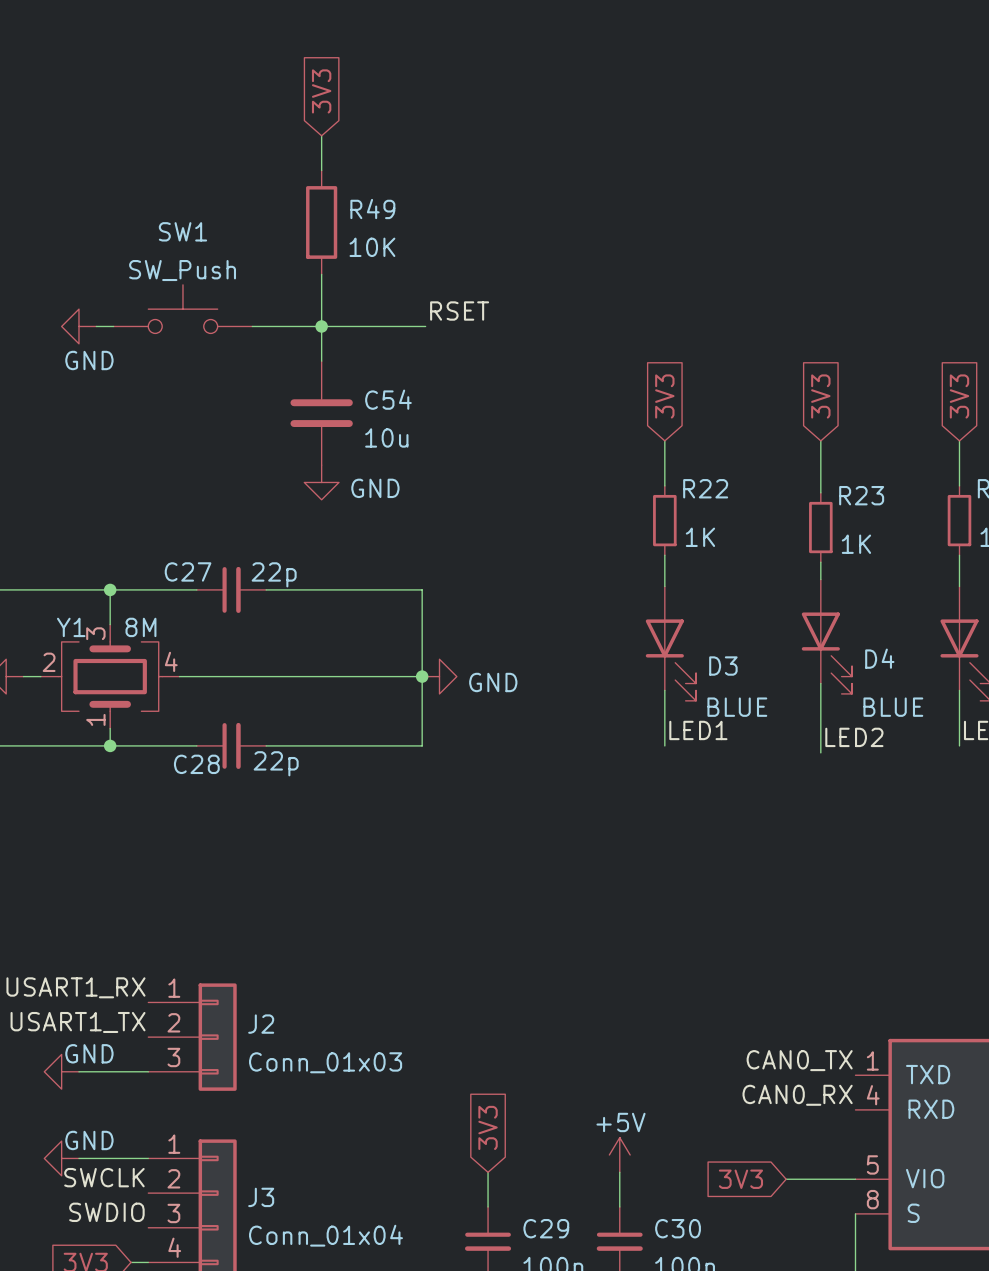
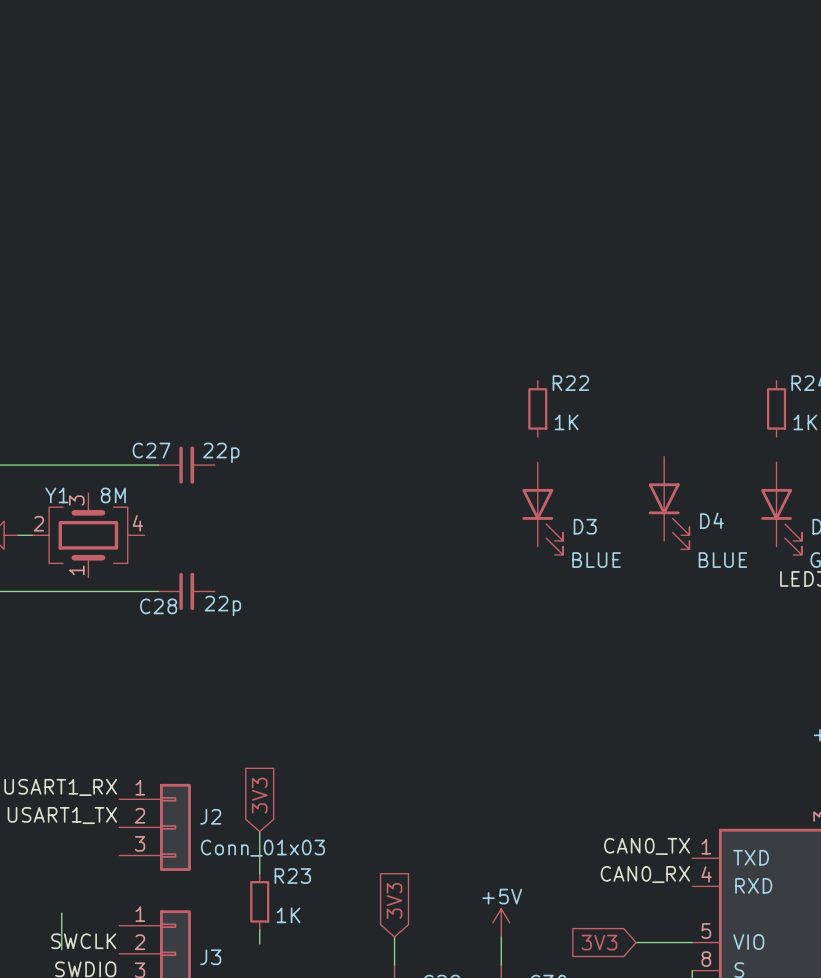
global label: 3V3 (321, 91) -> none
wire: (321, 135) (321, 170) -> none
R49: 10K (321, 222) -> none
wire: (321, 274) (321, 361) -> none
SW1: SW_Push (182, 309) -> none
label: RSET (459, 311) -> none
power symbol: GND (78, 326) -> none
wire: (96, 326) (113, 326) -> none
wire: (252, 326) (425, 326) -> none
junction: (321, 326) -> none
global label: 3V3 (664, 396) -> none
global label: 3V3 (820, 396) -> none
global label: 3V3 (959, 396) -> none
C54: 10u (321, 413) -> none
wire: (664, 440) (664, 485) -> none
wire: (820, 440) (820, 492) -> none
wire: (959, 440) (959, 485) -> none
power symbol: GND (321, 482) -> none
R23 position: (820, 527) -> (259, 901)
wire: (664, 555) (664, 586) -> none
wire: (959, 555) (959, 586) -> none
wire: (820, 562) (820, 579) -> none
wire: (110, 589) (110, 624) -> none
junction: (110, 589) -> none
wire: (266, 589) (422, 589) (422, 745) (266, 745) -> none
wire: (179, 676) (422, 676) -> none
junction: (422, 676) -> none
power symbol: GND (439, 676) -> none
wire: (820, 683) (820, 752) -> none
wire: (664, 690) (664, 745) -> none
wire: (959, 690) (959, 745) -> none
wire: (110, 728) (110, 745) -> none
label: LED1 (698, 730) -> none
label: LED2 (854, 737) -> none
junction: (110, 745) -> none
global label: none -> 3V3 (259, 795)
wire: none -> (259, 831) (259, 873)
power symbol: GND (61, 1071) -> none
wire: (78, 1071) (148, 1071) -> none
wire: none -> (61, 913) (61, 949)
power symbol: GND (61, 1158) -> none
wire: (78, 1158) (148, 1158) -> none
wire: none -> (259, 929) (259, 943)

